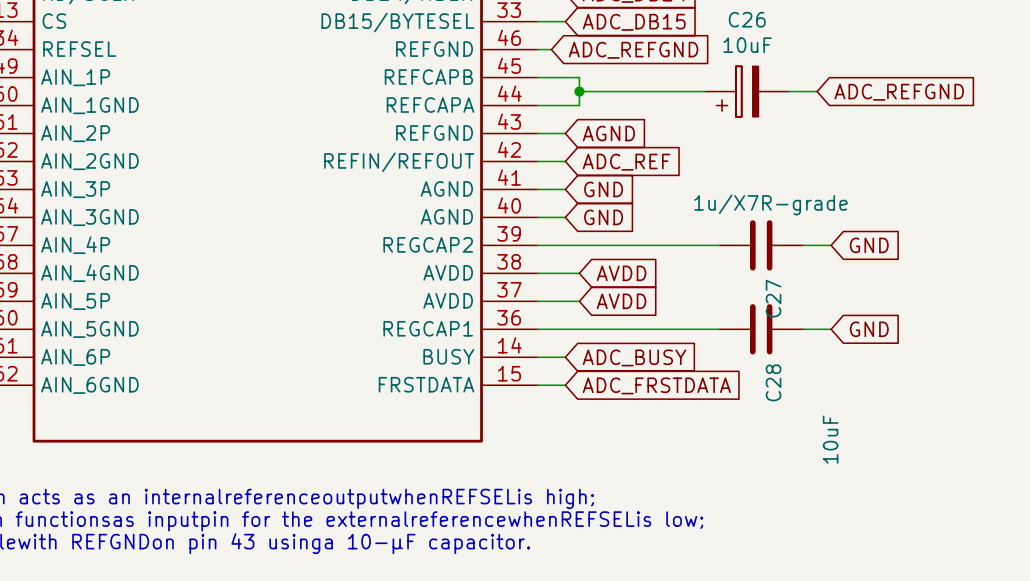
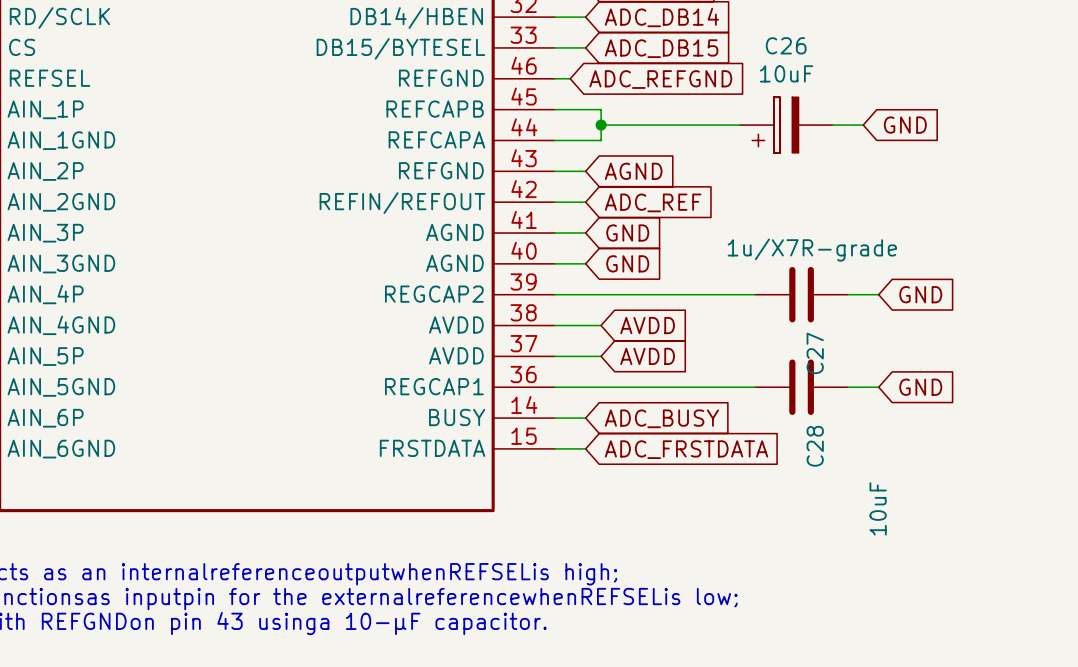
global label: ADC_REFGND (899, 92) -> GND (905, 125)

